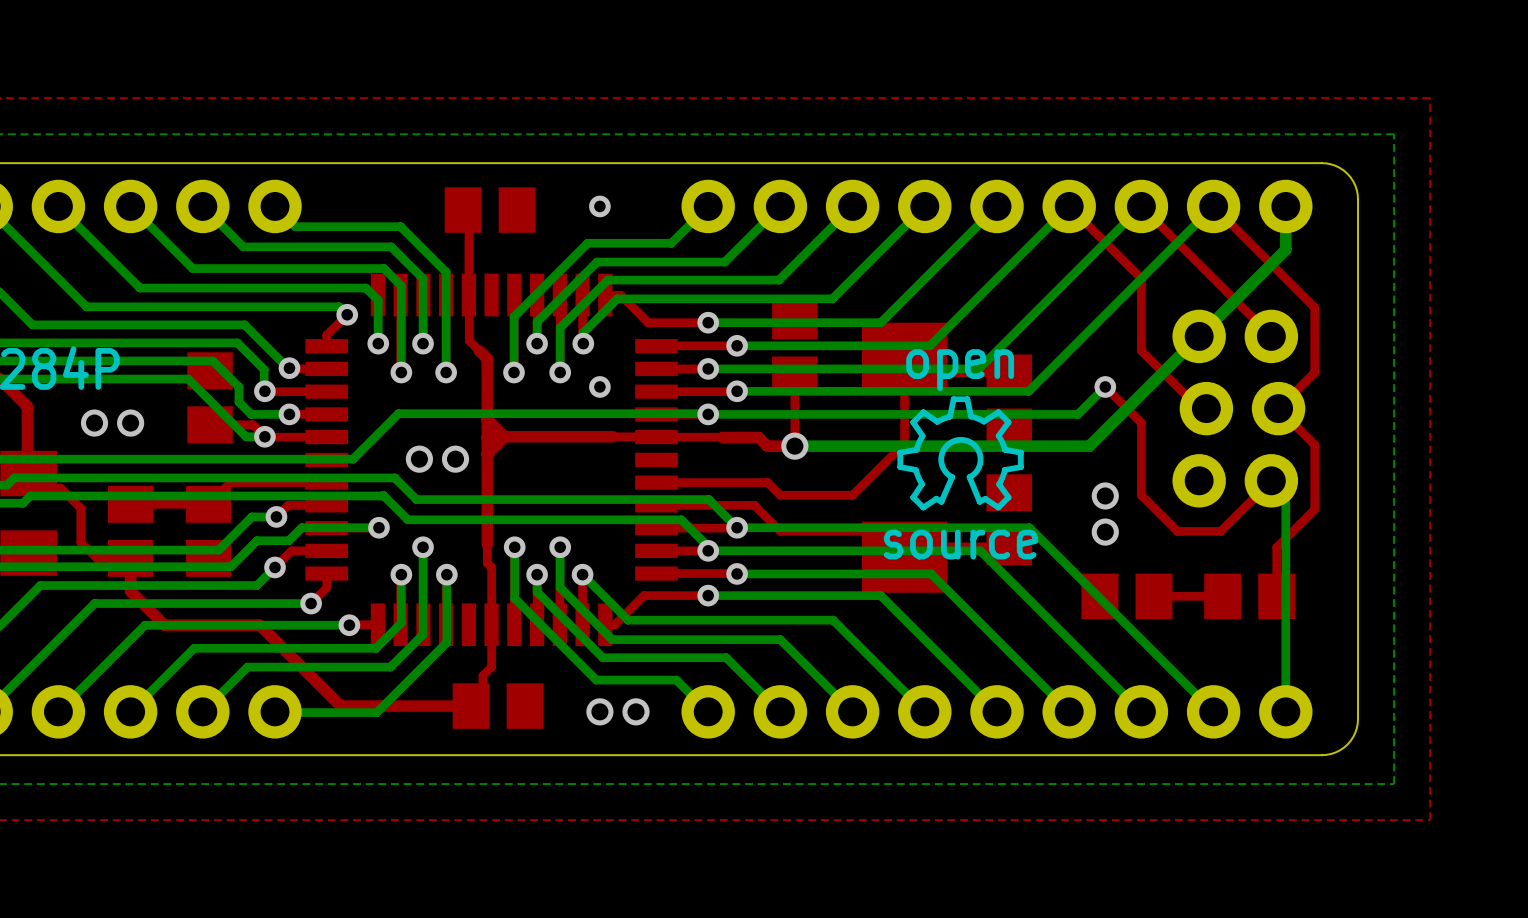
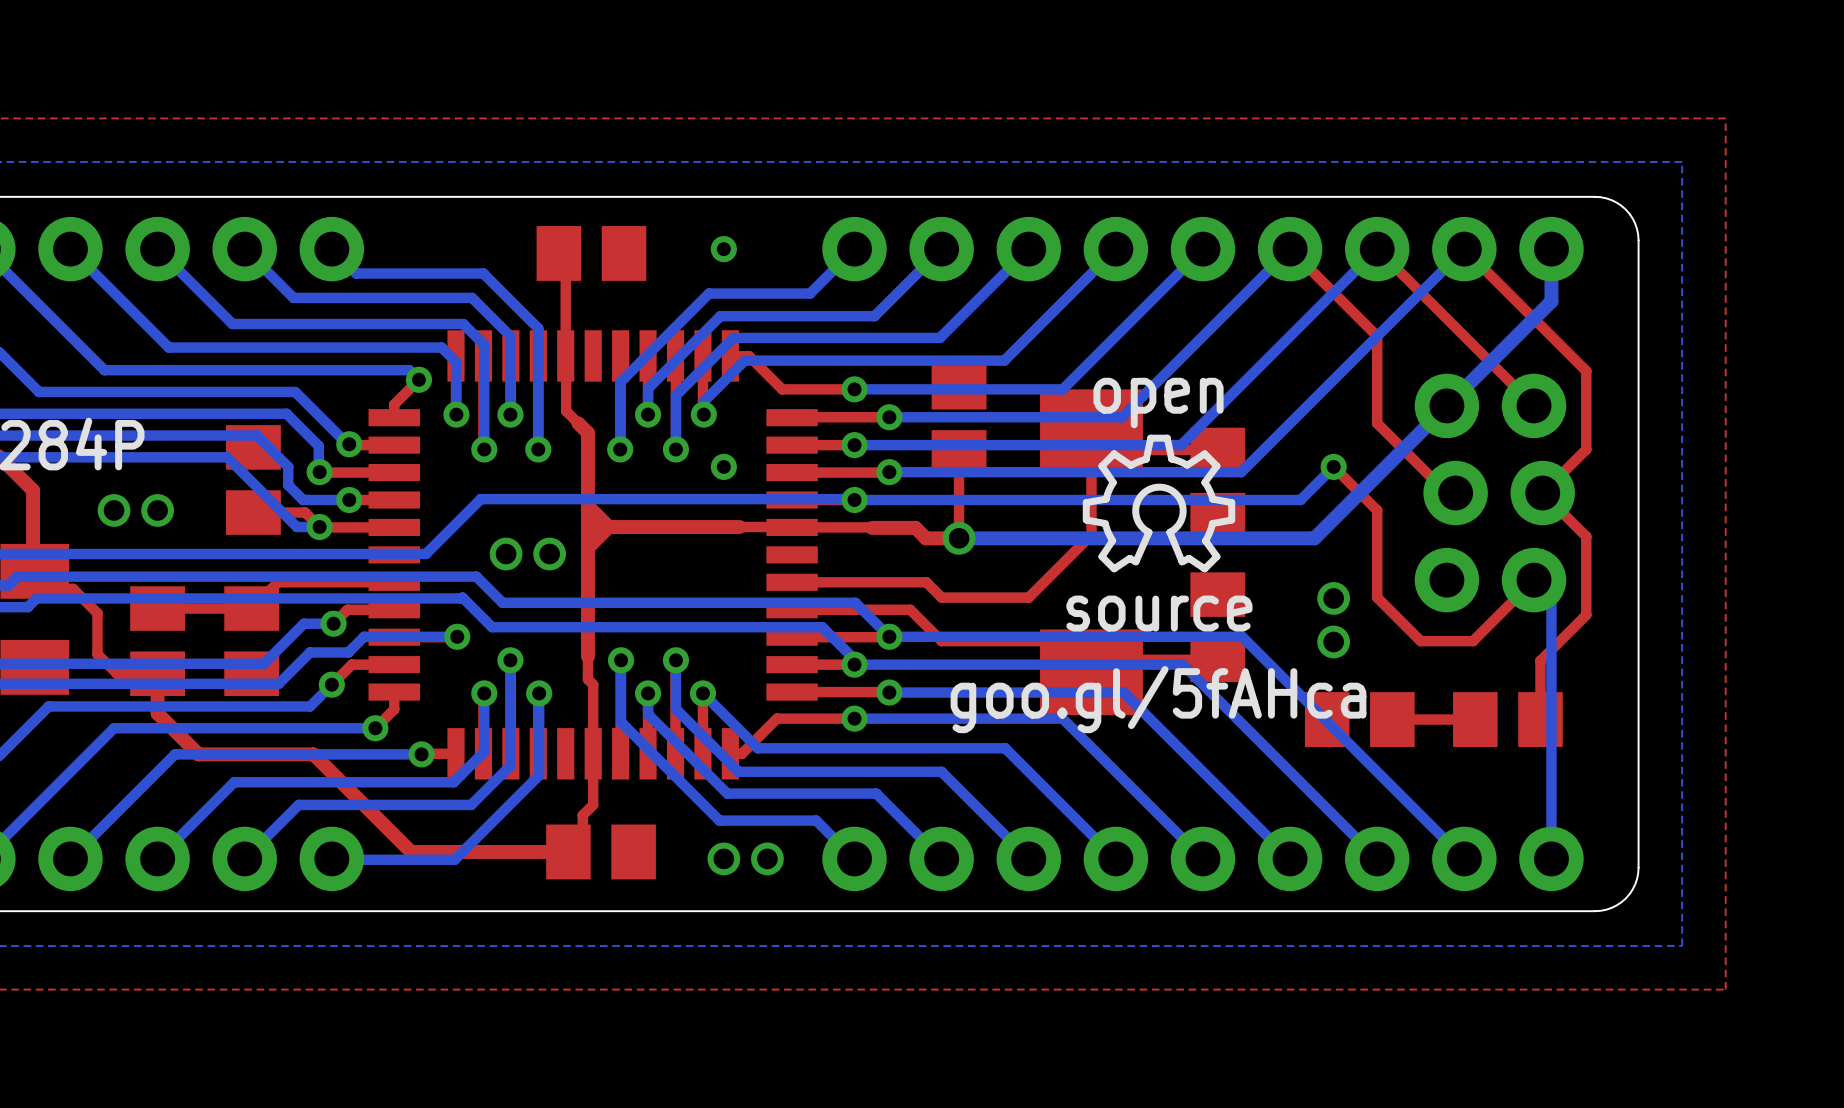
text position: open (960, 370) -> open (1158, 403)
drawing position: (960, 453) -> (1159, 503)
text position: source (960, 544) -> source (1159, 613)
text: none -> goo.gl/5fAHca (1158, 699)

